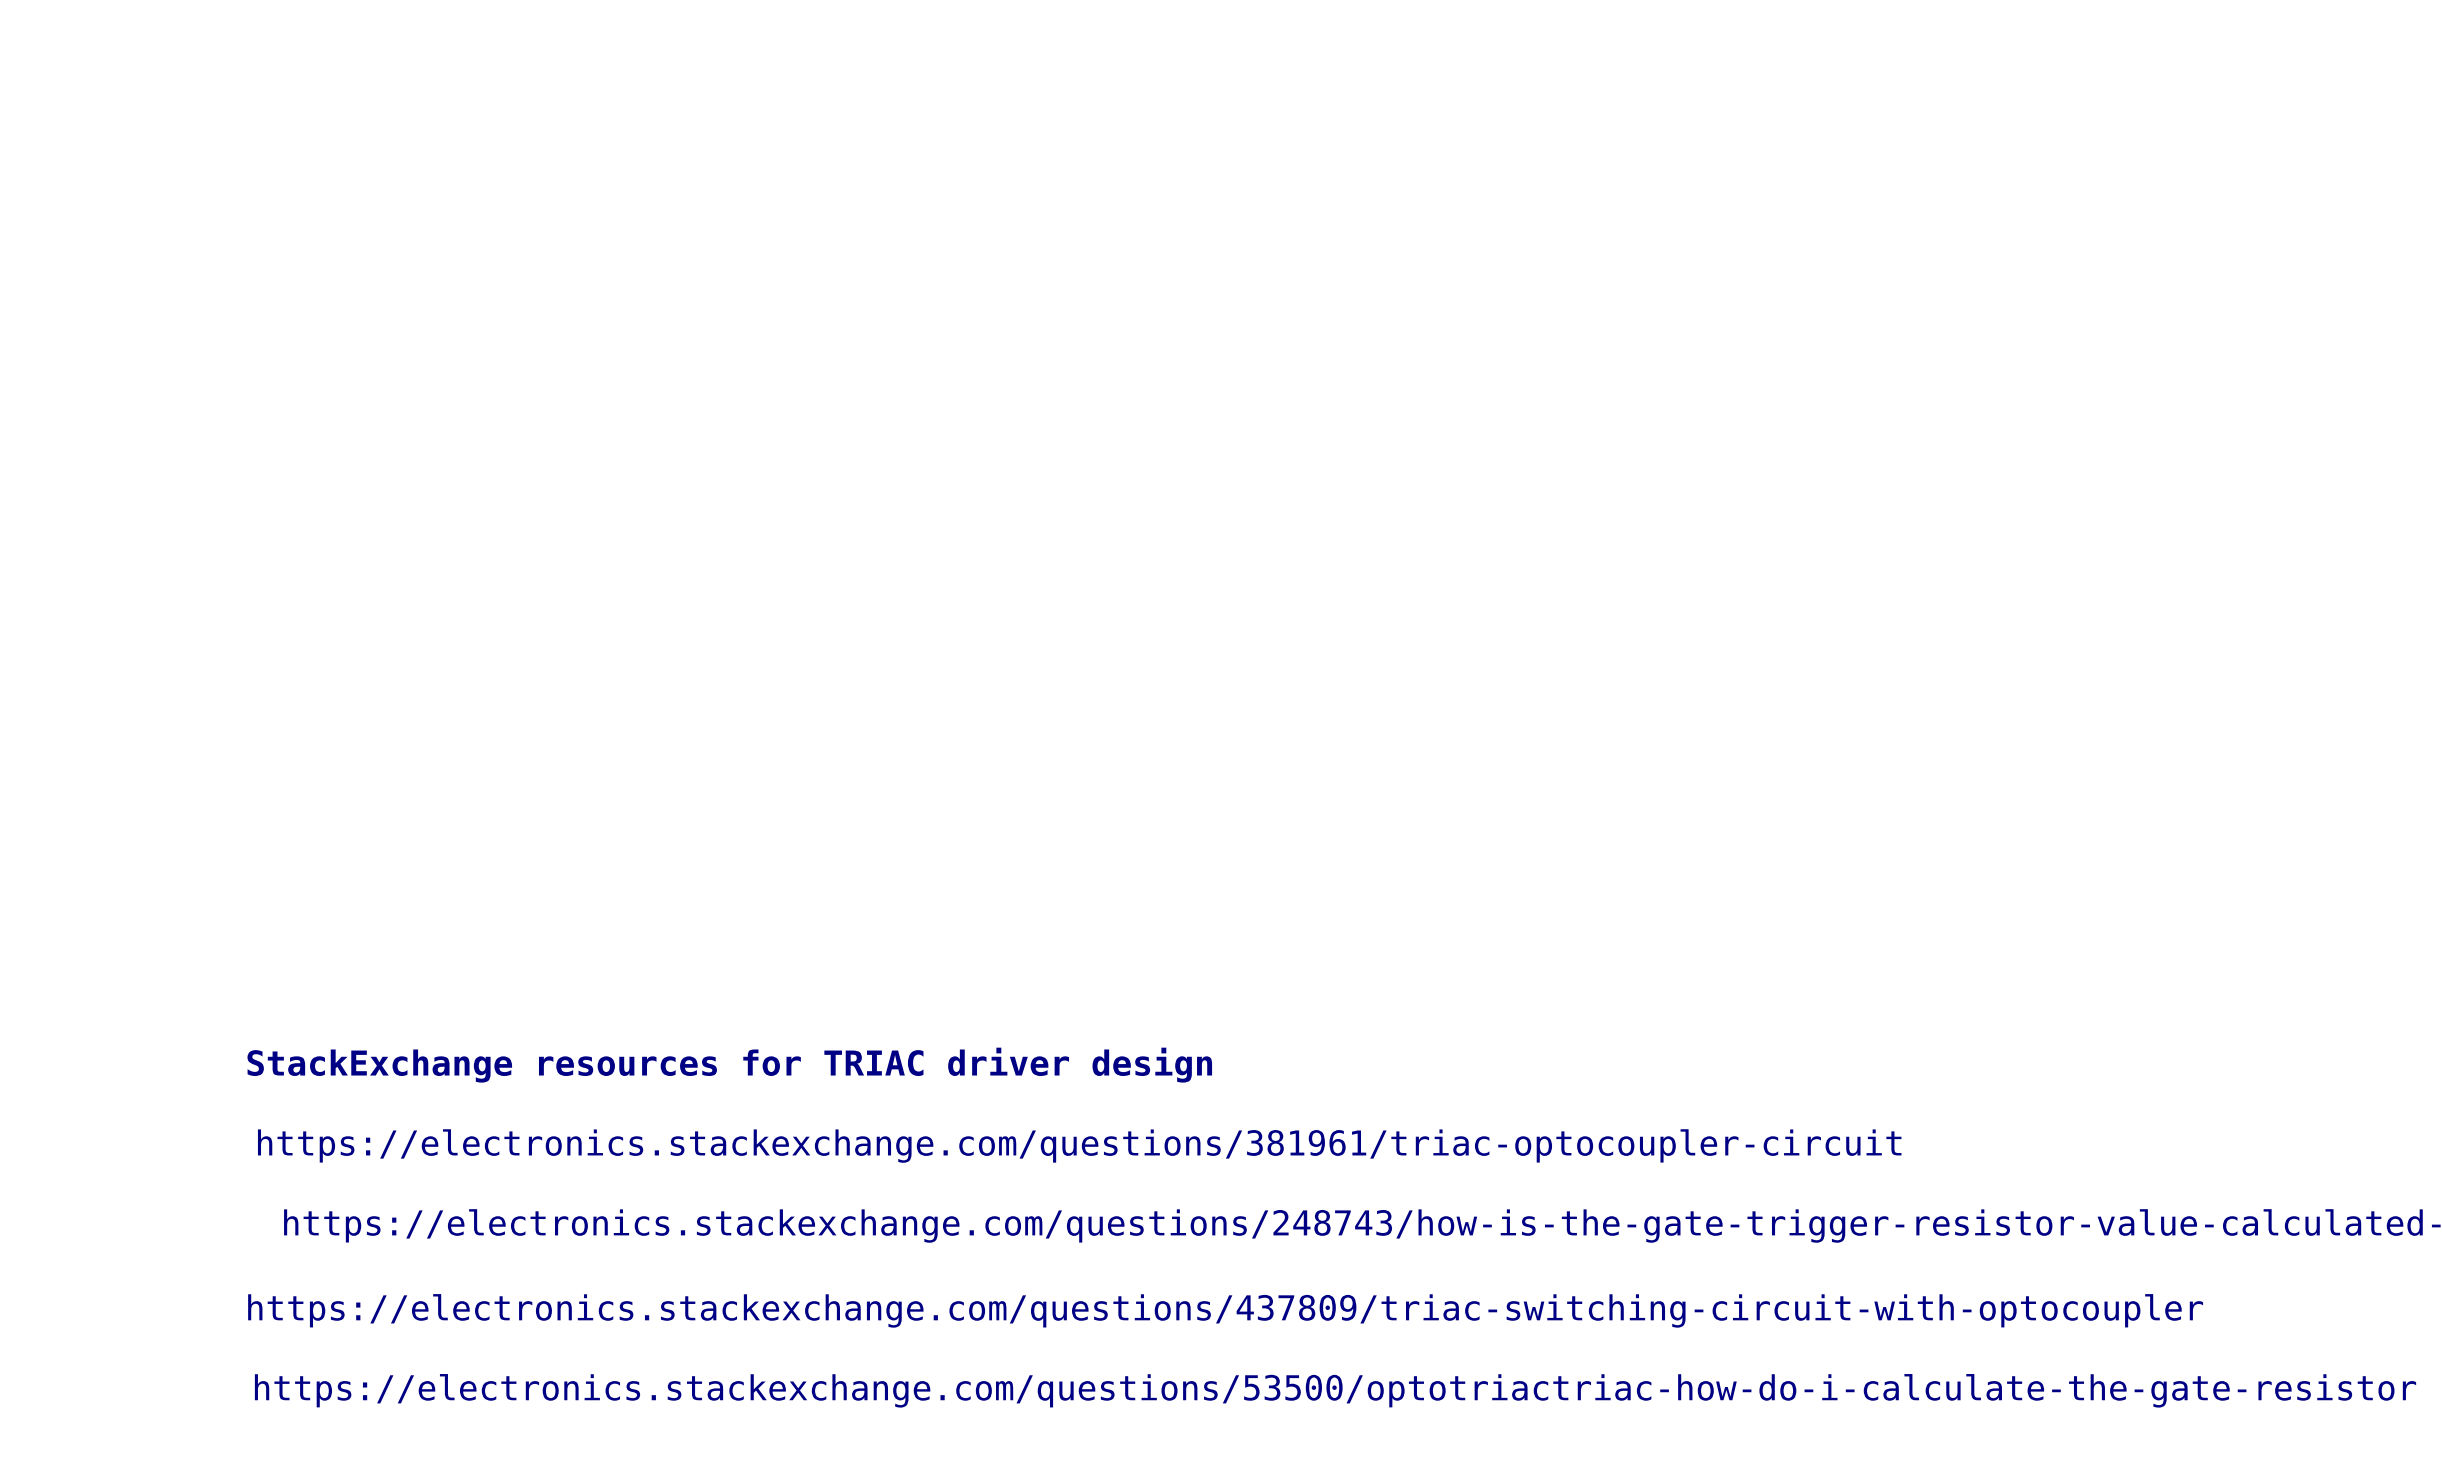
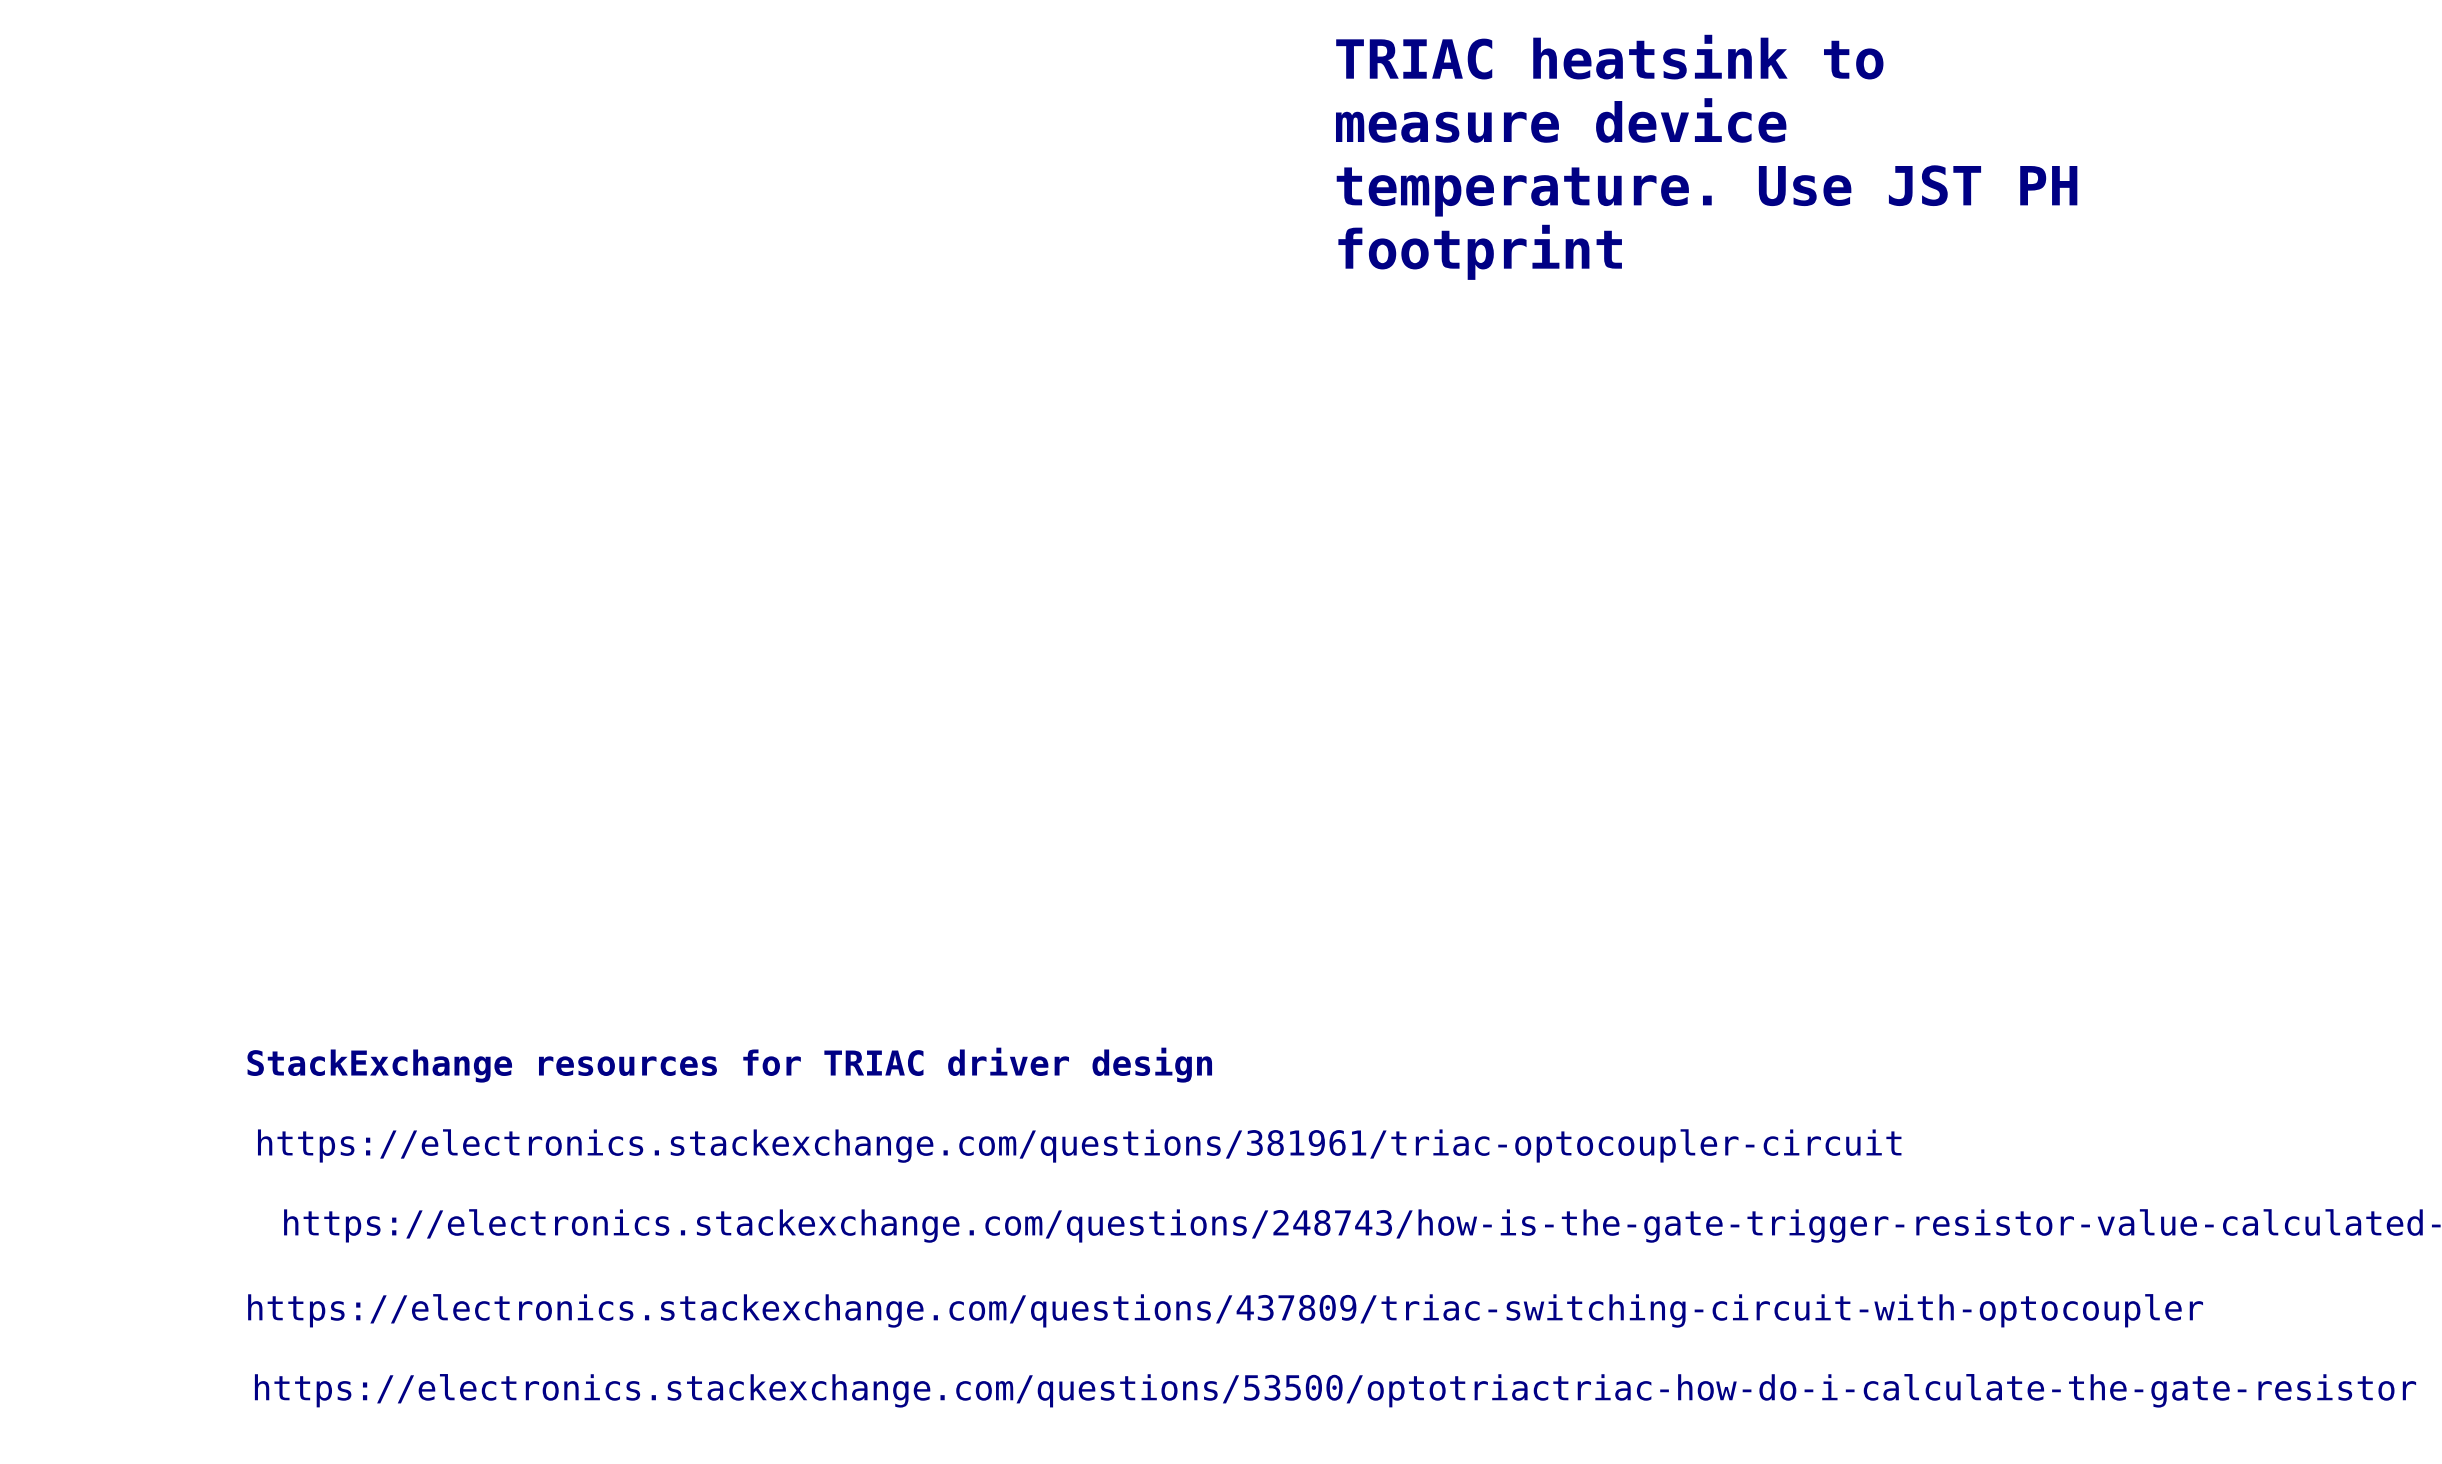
text: none -> TRIAC heatsink to (1609, 57)
text: none -> measure device (1561, 120)
text: none -> temperature. Use JST PH (1707, 190)
text: none -> footprint (1480, 252)

